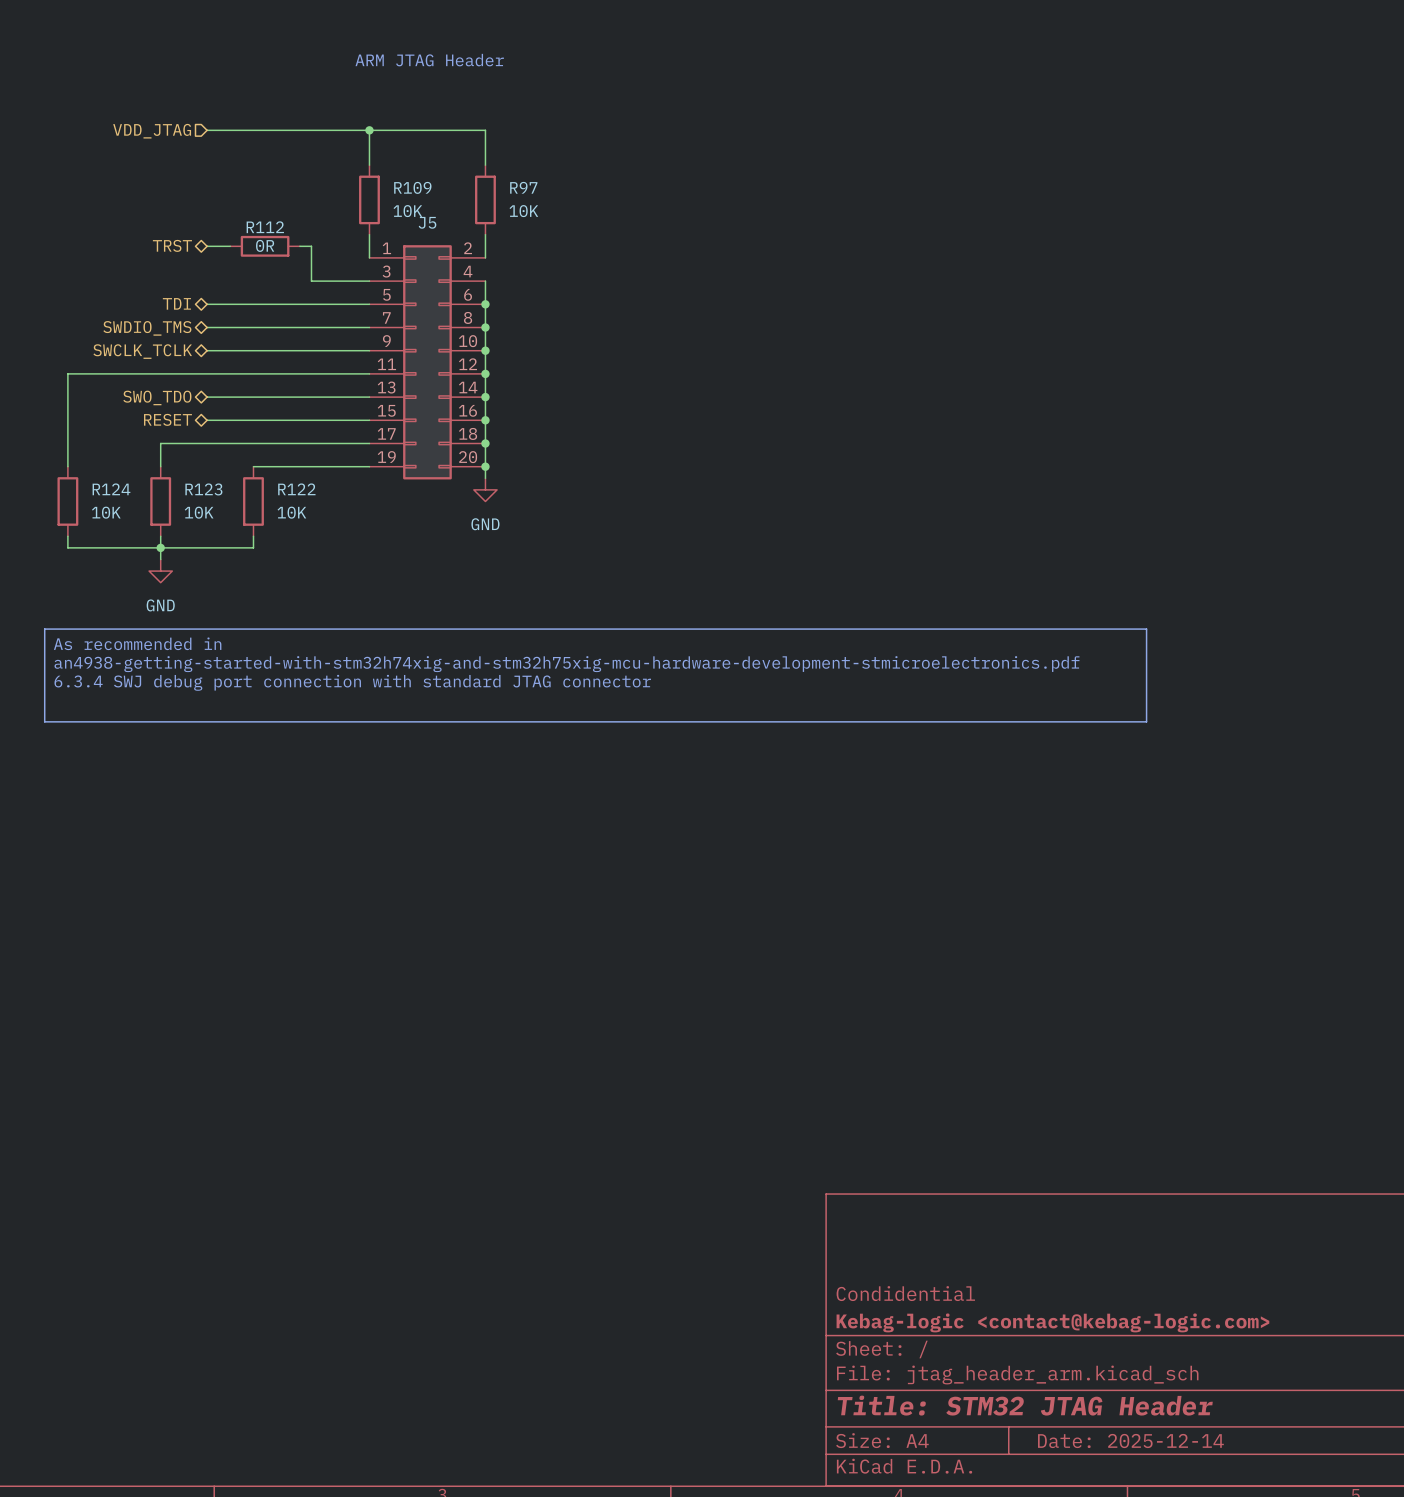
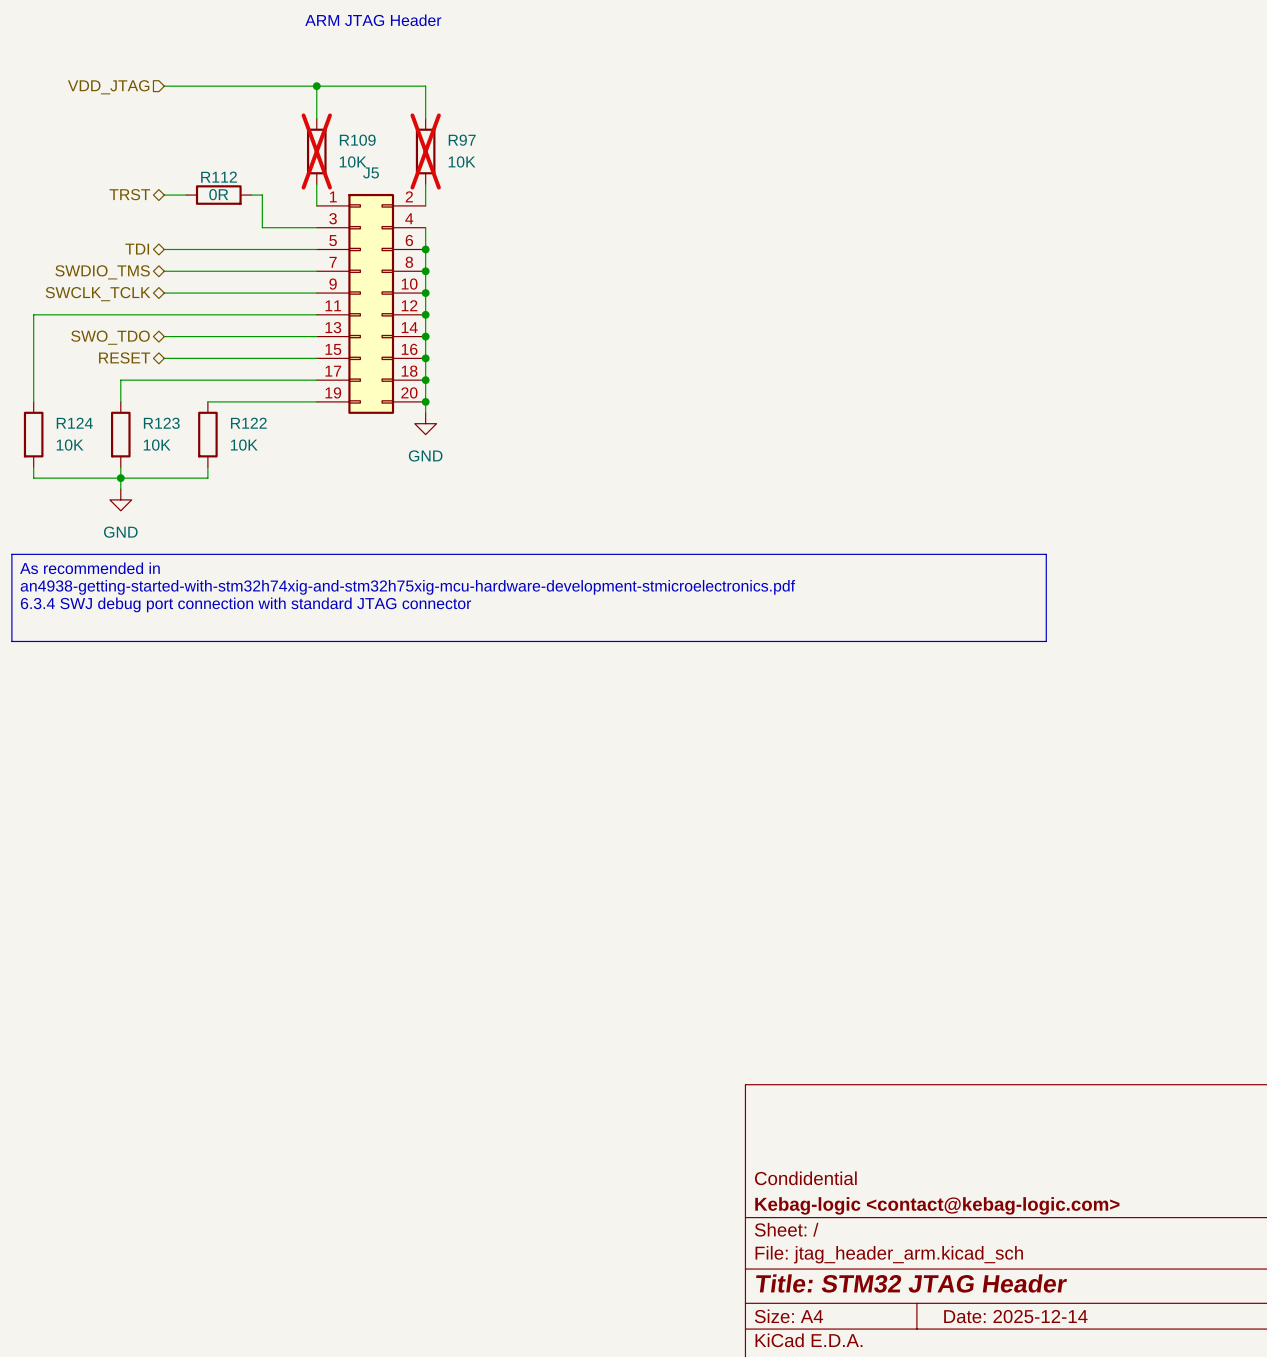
R109 do-not-place cross: none -> (316, 151)
R97 do-not-place cross: none -> (425, 151)

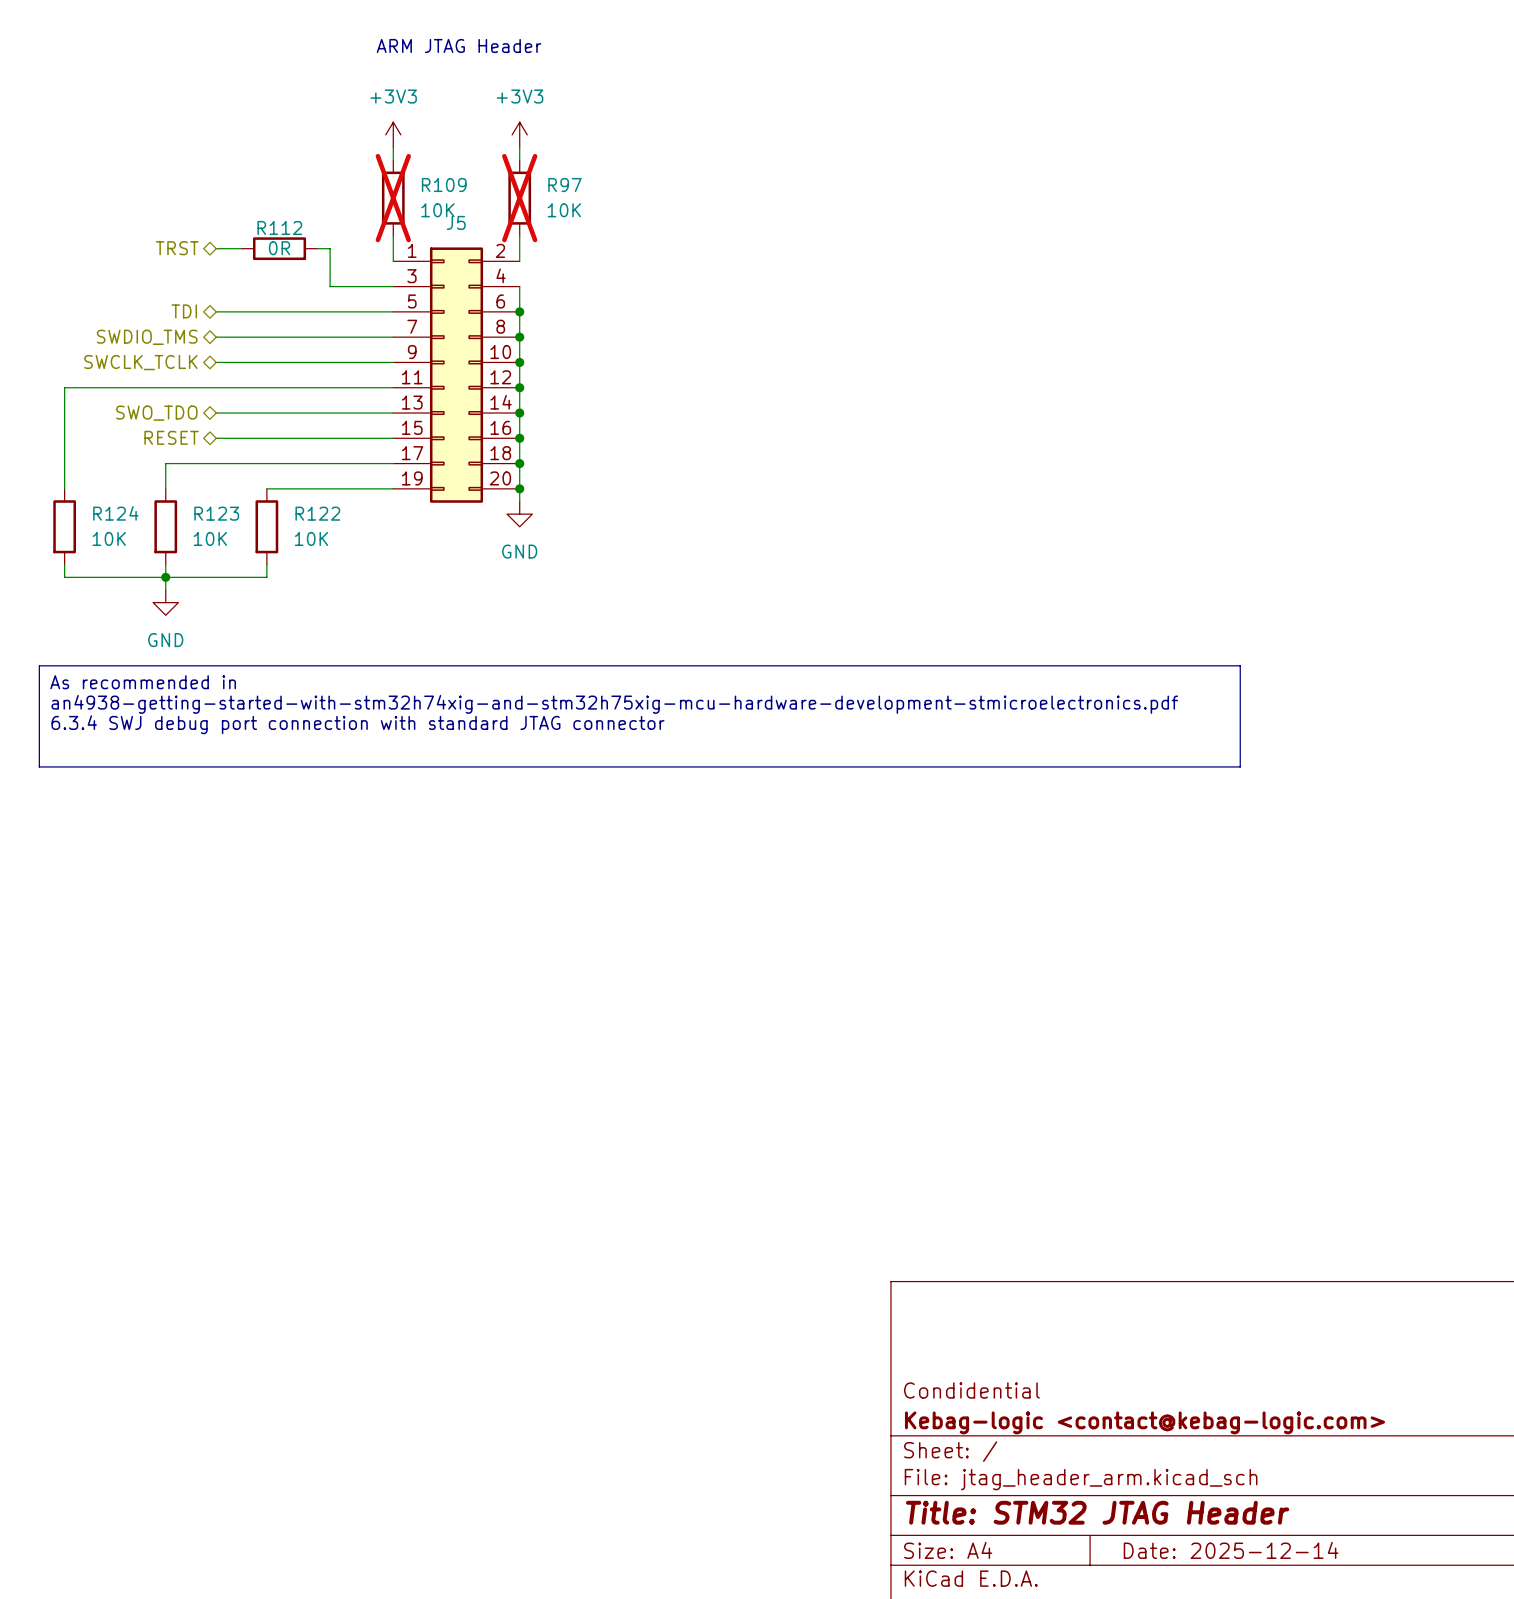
wire: (164, 86) (425, 86) (425, 107) -> none
junction: (316, 86) -> none
hierarchical label: VDD_JTAG (108, 87) -> none
power symbol: none -> +3V3 (393, 134)
power symbol: none -> +3V3 (519, 134)

